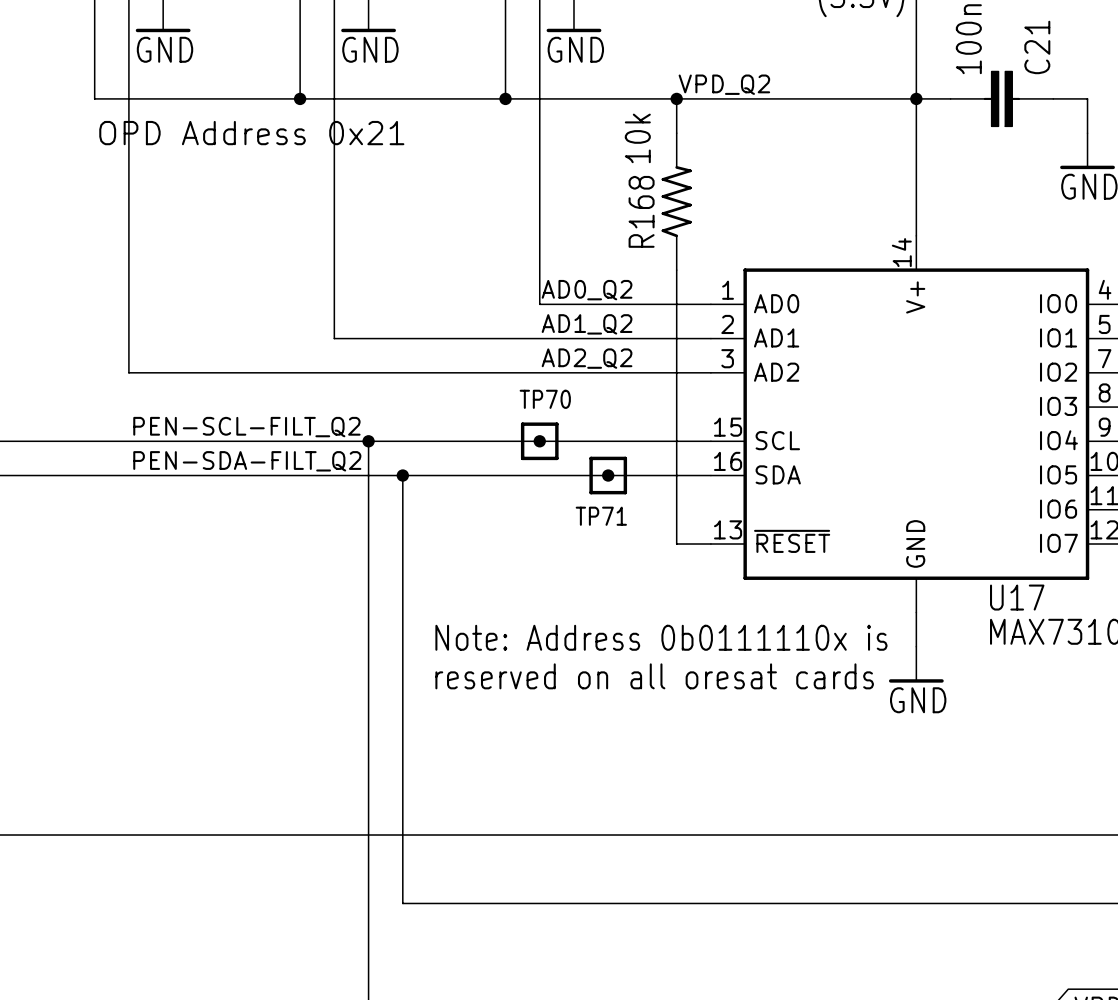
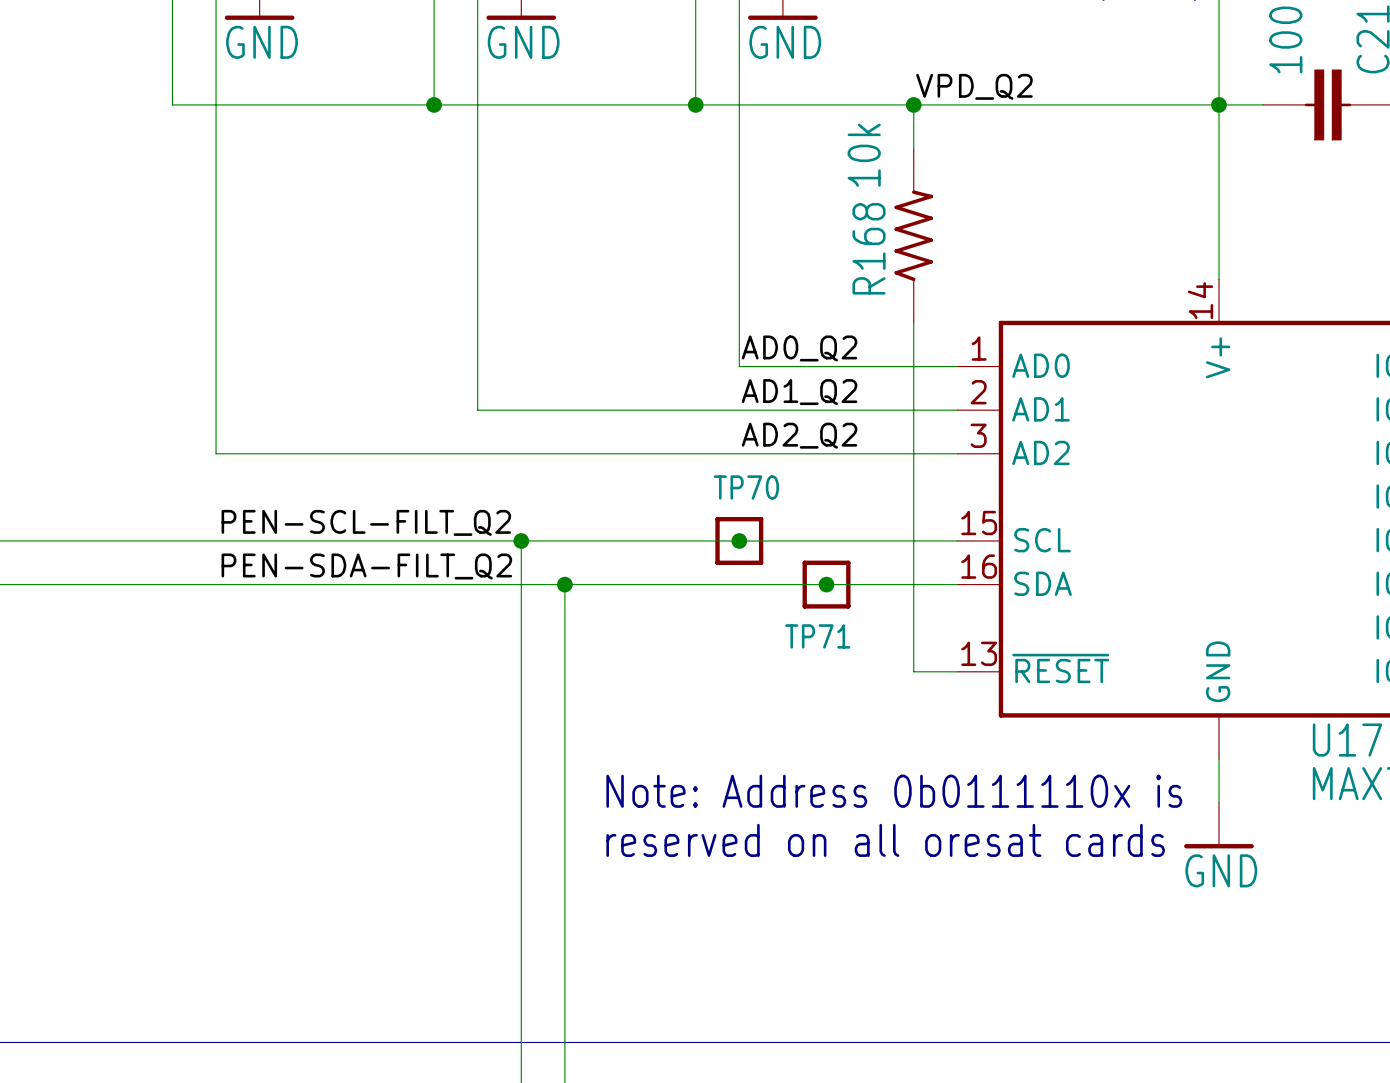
text: OPD Address 0x21 (251, 133) -> none

